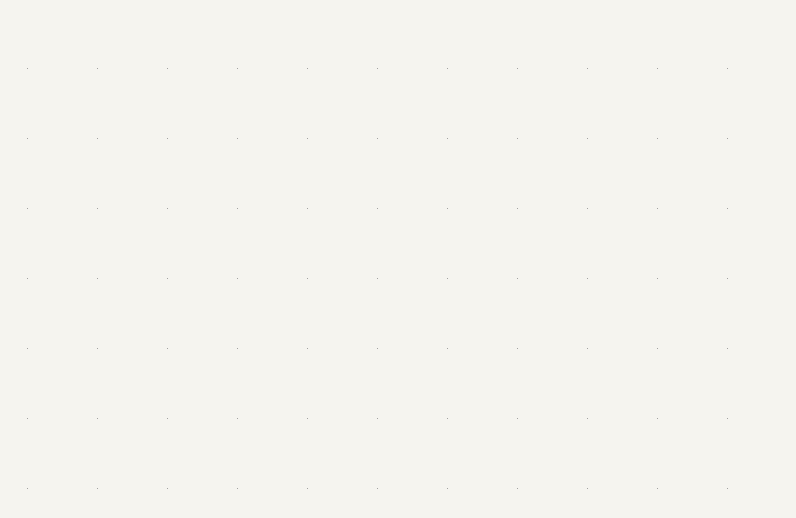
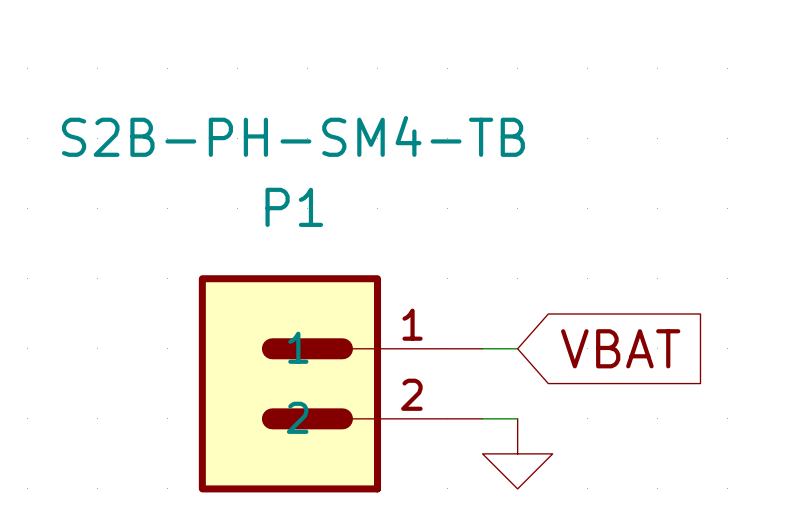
wire: none -> (482, 348) (517, 348)
global label: none -> VBAT (620, 348)
P1: none -> S2B-PH-SM4-TB (340, 383)
wire: none -> (482, 418) (517, 418)
power symbol: none -> (517, 453)

